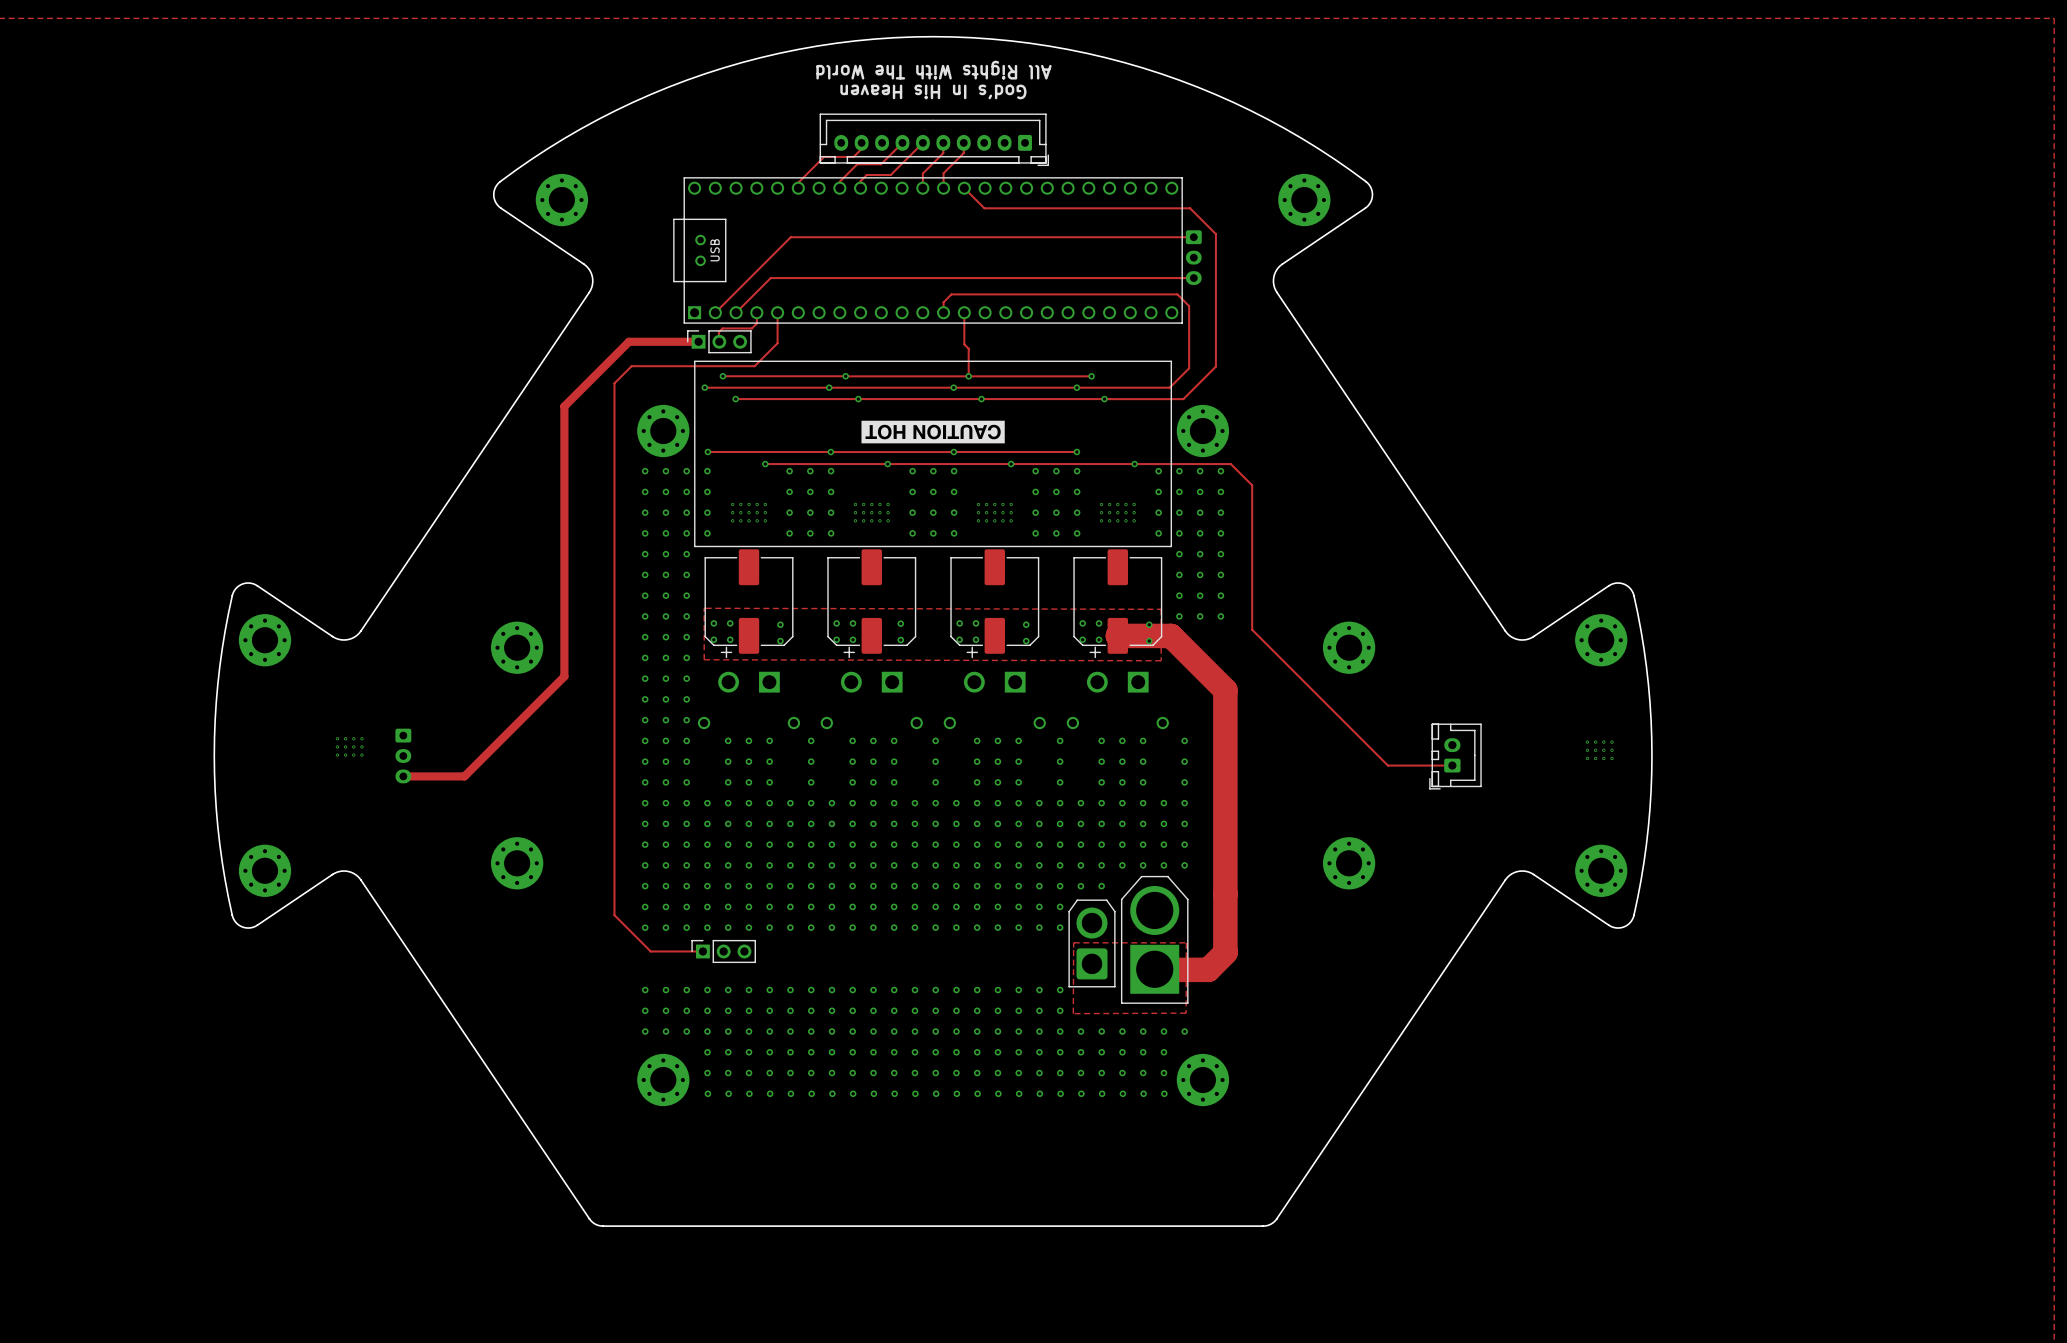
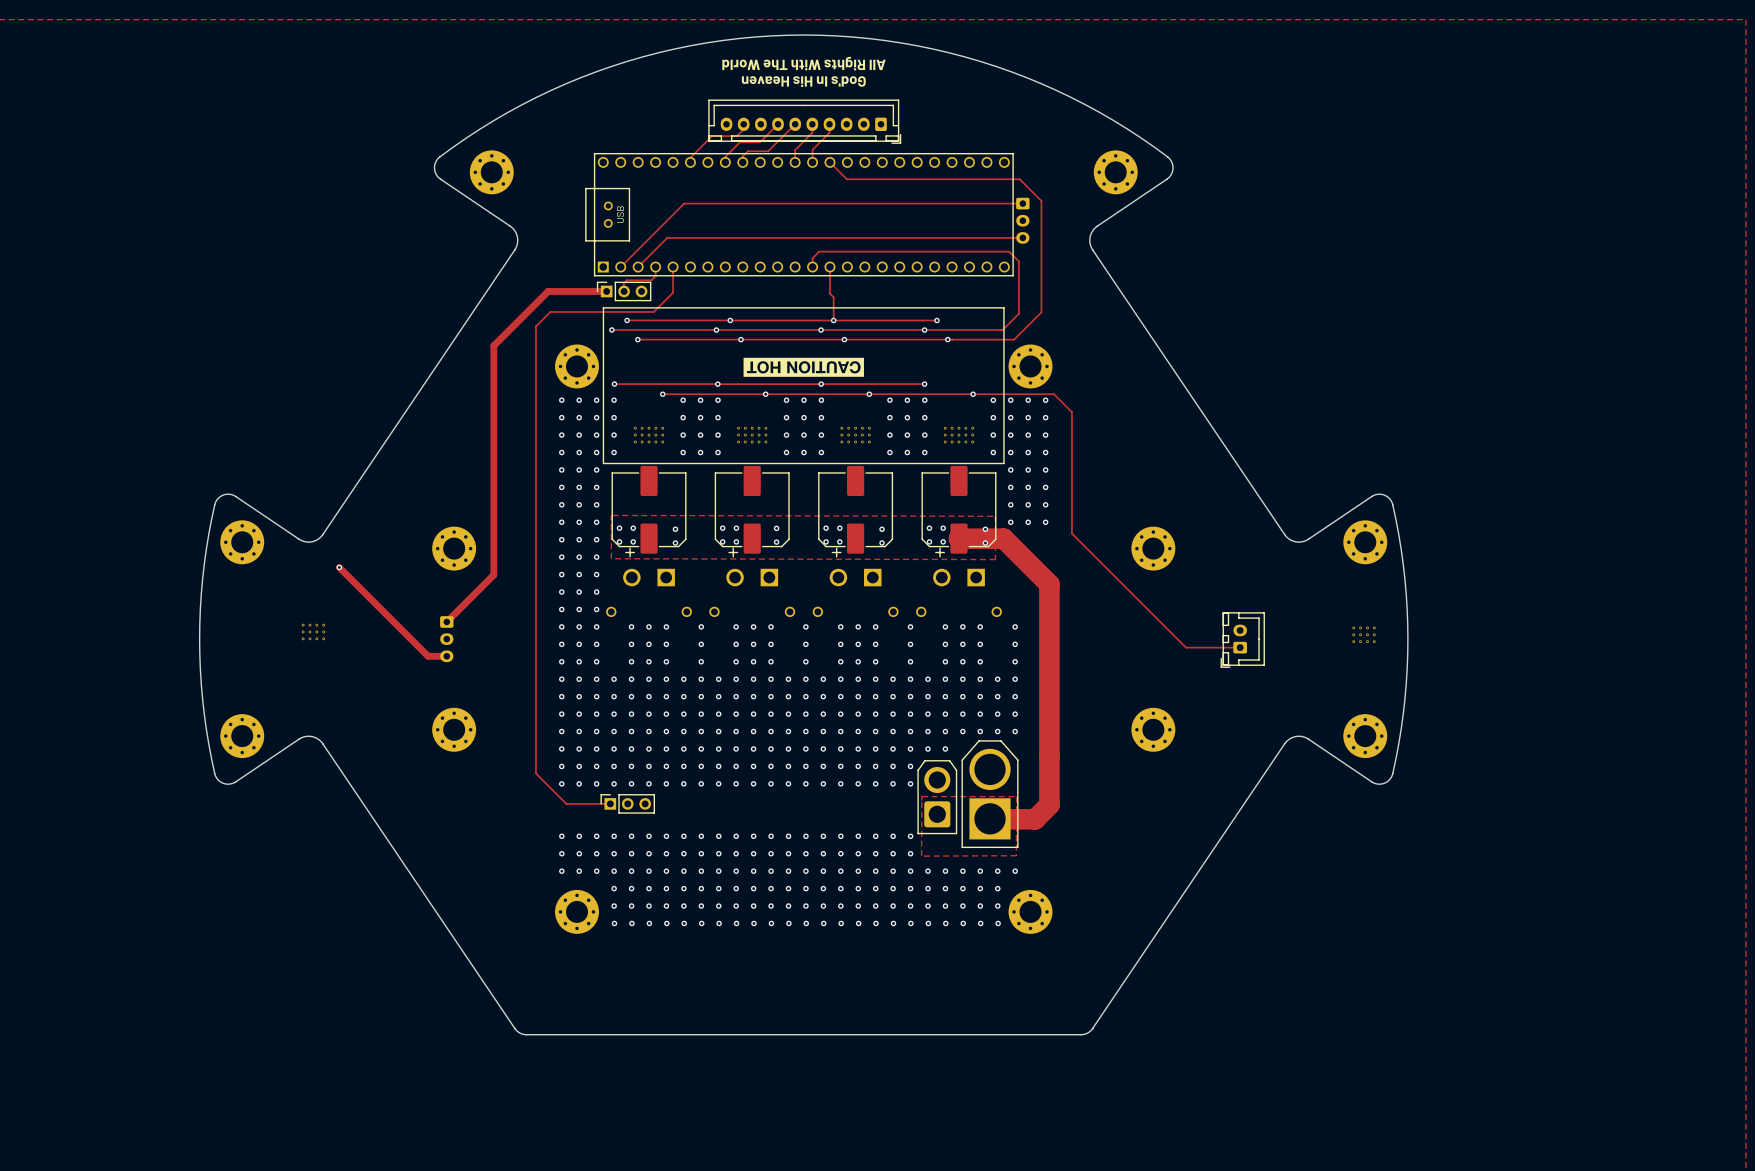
track: none -> (339, 567) (428, 656) (446, 656)
via: none -> (339, 567)
track: (564, 676) (464, 776) (403, 776) -> (493, 572) (446, 621)
part position: (403, 756) -> (446, 639)

